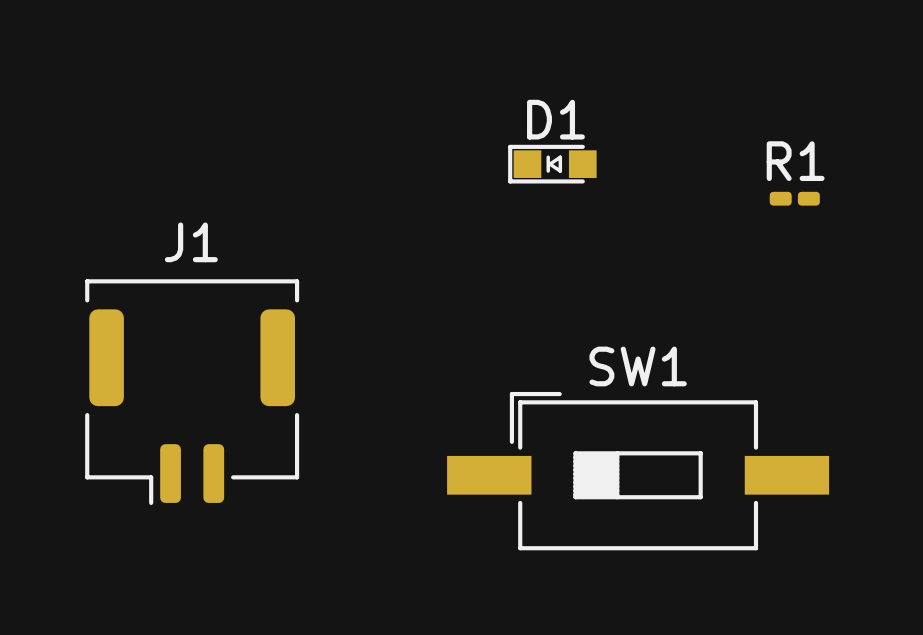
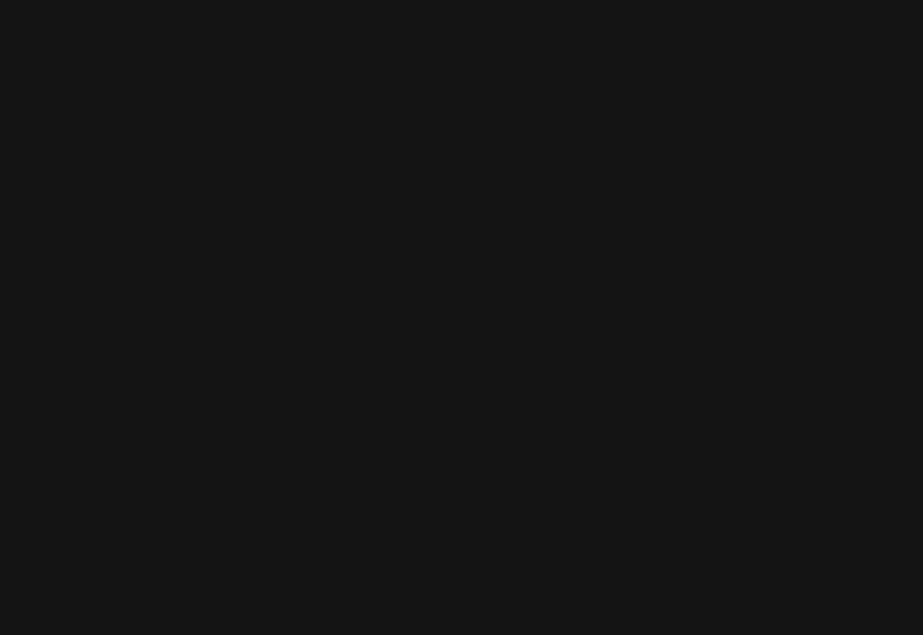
D1: (552, 164) -> none
R1: (794, 198) -> none
J1: (192, 392) -> none
SW1: (638, 471) -> none

